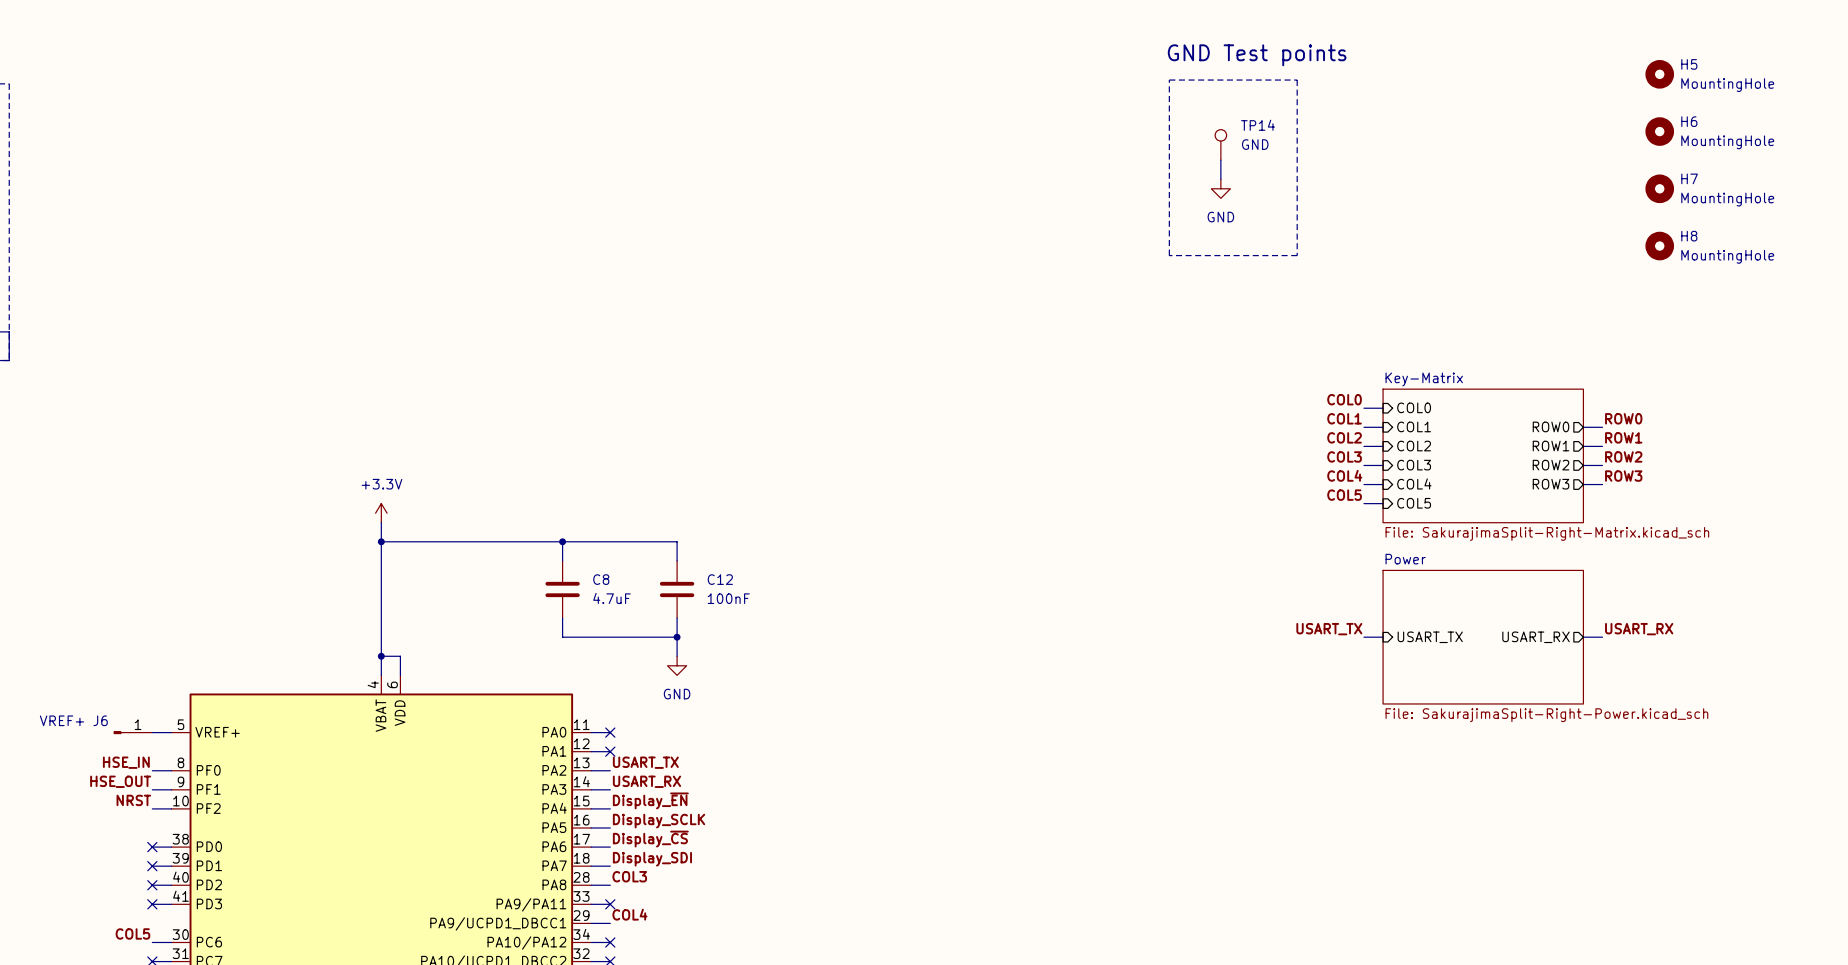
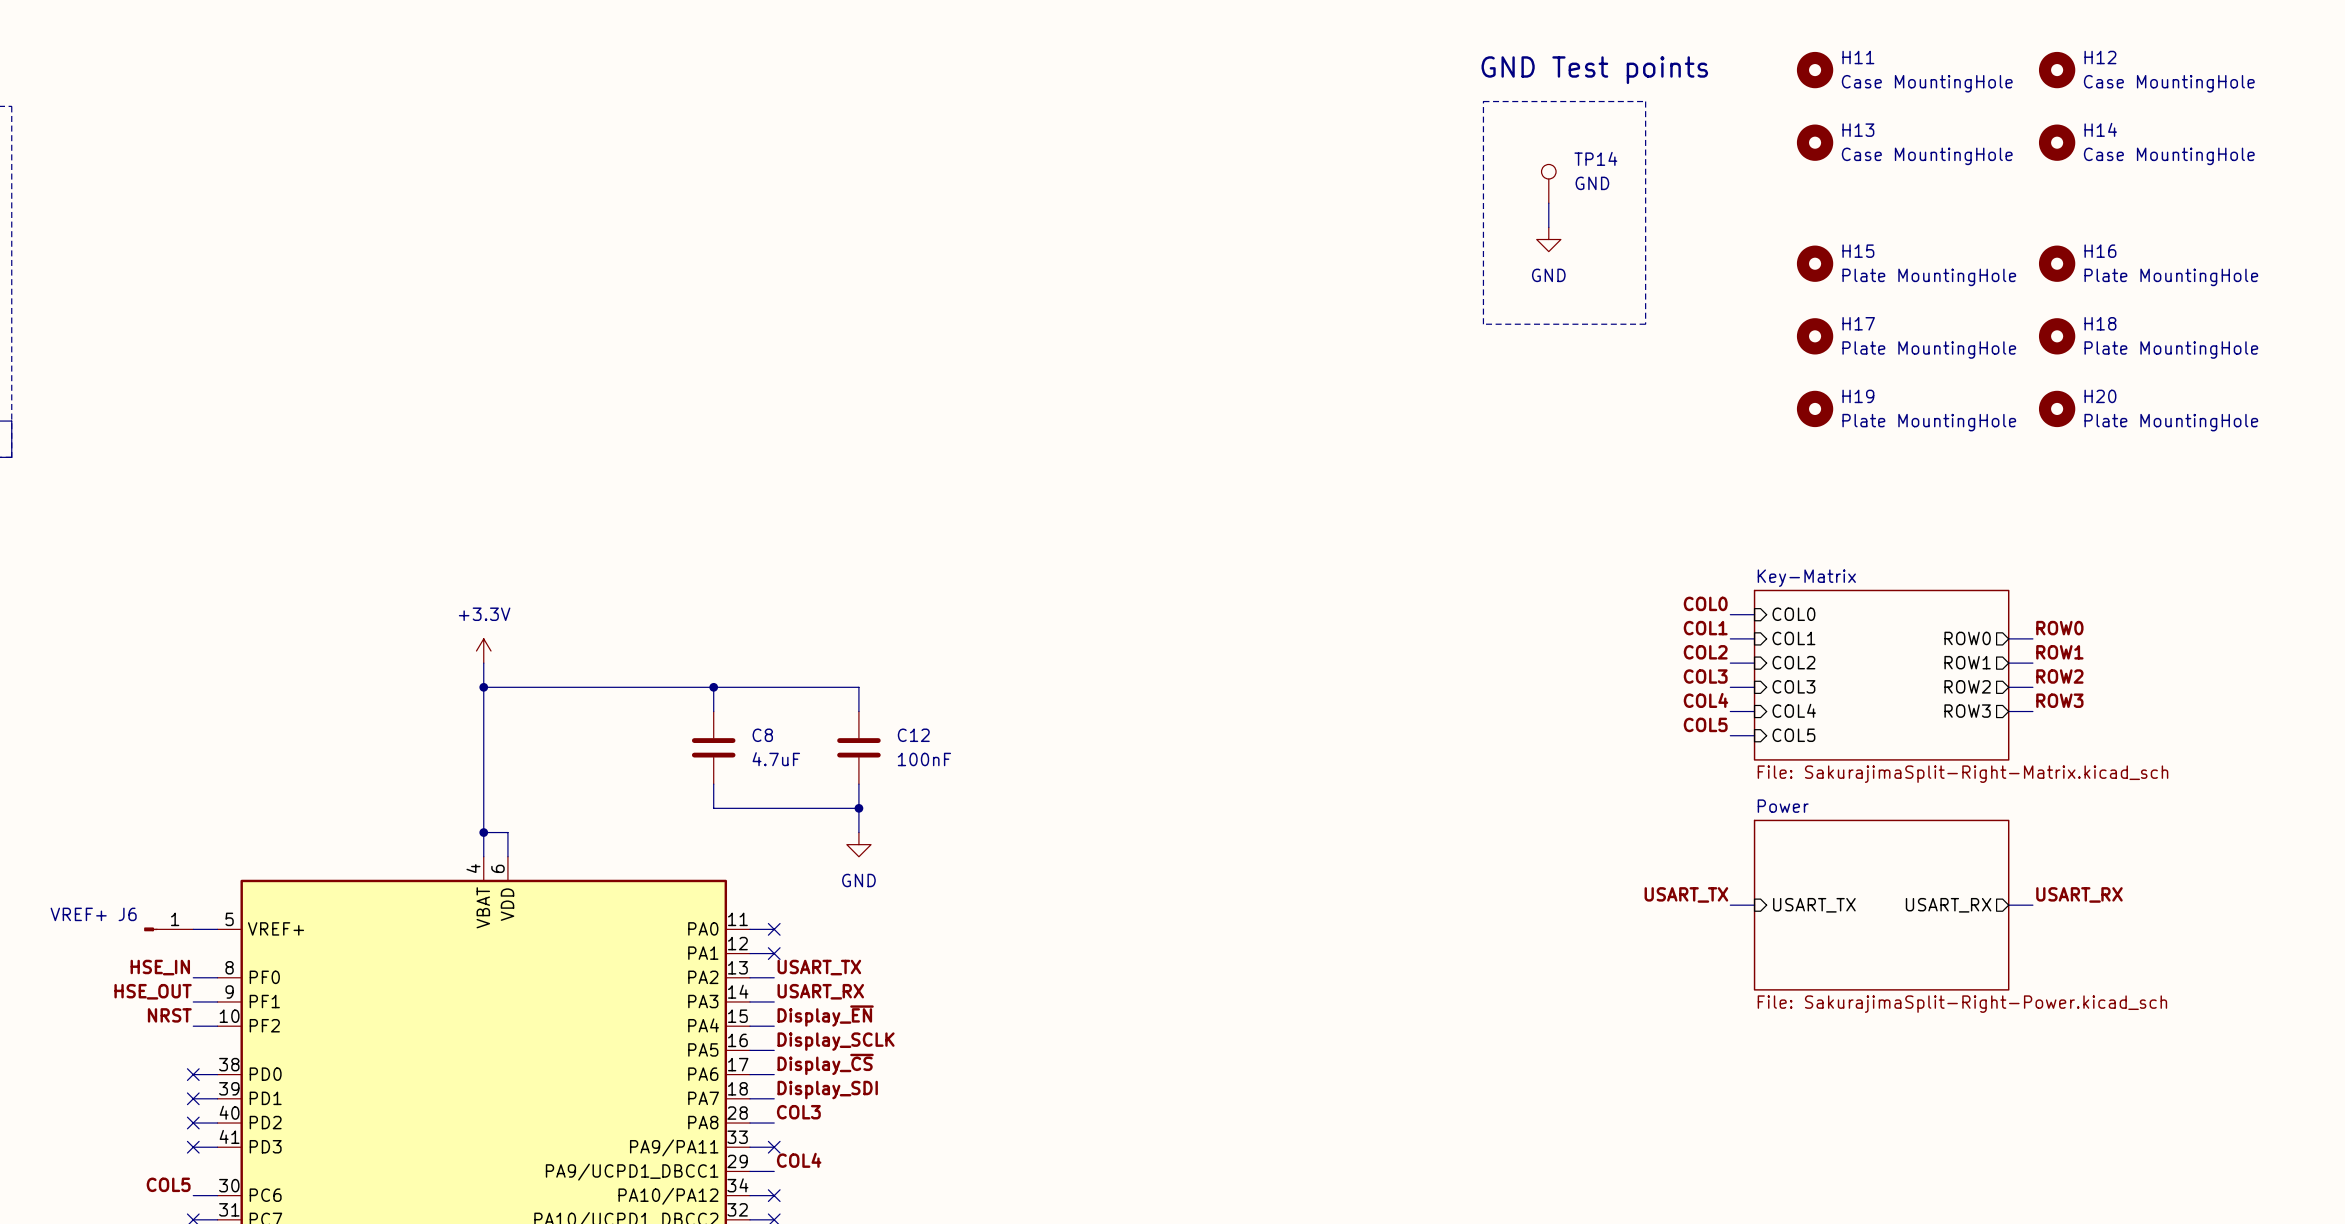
H11: none -> Case MountingHole (1815, 70)
H12: none -> Case MountingHole (2057, 70)
H5: MountingHole (1659, 74) -> none
H13: none -> Case MountingHole (1815, 142)
H14: none -> Case MountingHole (2057, 142)
H6: MountingHole (1659, 131) -> none
H7: MountingHole (1659, 188) -> none
H15: none -> Plate MountingHole (1815, 263)
H16: none -> Plate MountingHole (2057, 263)
H8: MountingHole (1659, 246) -> none
H17: none -> Plate MountingHole (1815, 336)
H18: none -> Plate MountingHole (2057, 336)
H19: none -> Plate MountingHole (1815, 408)
H20: none -> Plate MountingHole (2057, 408)
label: COL0 (1344, 399) -> none
sheet pin: COL0 (1414, 407) -> none
wire: (1363, 408) (1383, 408) -> (1730, 735) (1754, 735)
label: COL1 (1344, 418) -> none
label position: ROW0 (1623, 418) -> ROW0 (2059, 628)
sheet pin: COL1 (1414, 426) -> none
sheet pin position: ROW0 (1551, 426) -> ROW0 (1967, 638)
wire: (1363, 427) (1383, 427) -> (1730, 711) (1754, 711)
wire: (1583, 427) (1602, 427) -> (2008, 638) (2032, 638)
label position: COL2 (1344, 437) -> COL2 (1705, 652)
label position: ROW1 (1623, 437) -> ROW1 (2059, 652)
wire: (1363, 446) (1383, 446) -> (1730, 663) (1754, 663)
sheet pin position: COL2 (1414, 446) -> COL2 (1793, 662)
sheet pin position: ROW1 (1551, 446) -> ROW1 (1967, 662)
wire: (1583, 446) (1602, 446) -> (2008, 663) (2032, 663)
sheet Key-Matrix position: (1483, 455) -> (1881, 675)
label position: COL3 (1344, 456) -> COL3 (1705, 676)
label position: ROW2 (1623, 456) -> ROW2 (2059, 676)
wire: (1363, 465) (1383, 465) -> (1730, 687) (1754, 687)
sheet pin position: COL3 (1414, 465) -> COL3 (1793, 686)
sheet pin position: ROW2 (1551, 465) -> ROW2 (1967, 686)
wire: (1583, 465) (1602, 465) -> (2008, 687) (2032, 687)
label: COL4 (1344, 475) -> COL0 (1705, 603)
label position: ROW3 (1623, 476) -> ROW3 (2059, 700)
sheet pin: COL4 (1414, 483) -> COL0 (1793, 614)
sheet pin position: ROW3 (1551, 484) -> ROW3 (1967, 711)
wire: (1583, 484) (1602, 484) -> (2008, 711) (2032, 711)
label: COL5 (1344, 495) -> COL1 (1705, 628)
sheet pin: COL5 (1414, 503) -> COL1 (1793, 638)
label: none -> COL4 (1705, 700)
sheet pin: none -> COL4 (1794, 710)
label: none -> COL5 (1705, 724)
sheet pin: none -> COL5 (1793, 735)
label position: USART_TX (1329, 629) -> USART_TX (1686, 894)
label position: USART_RX (1639, 629) -> USART_RX (2079, 894)
wire: (1363, 637) (1383, 637) -> (1730, 905) (1754, 905)
sheet pin position: USART_TX (1430, 637) -> USART_TX (1814, 905)
sheet Power position: (1483, 637) -> (1881, 905)
sheet pin position: USART_RX (1536, 637) -> USART_RX (1948, 905)
wire: (1583, 637) (1602, 637) -> (2008, 905) (2032, 905)

